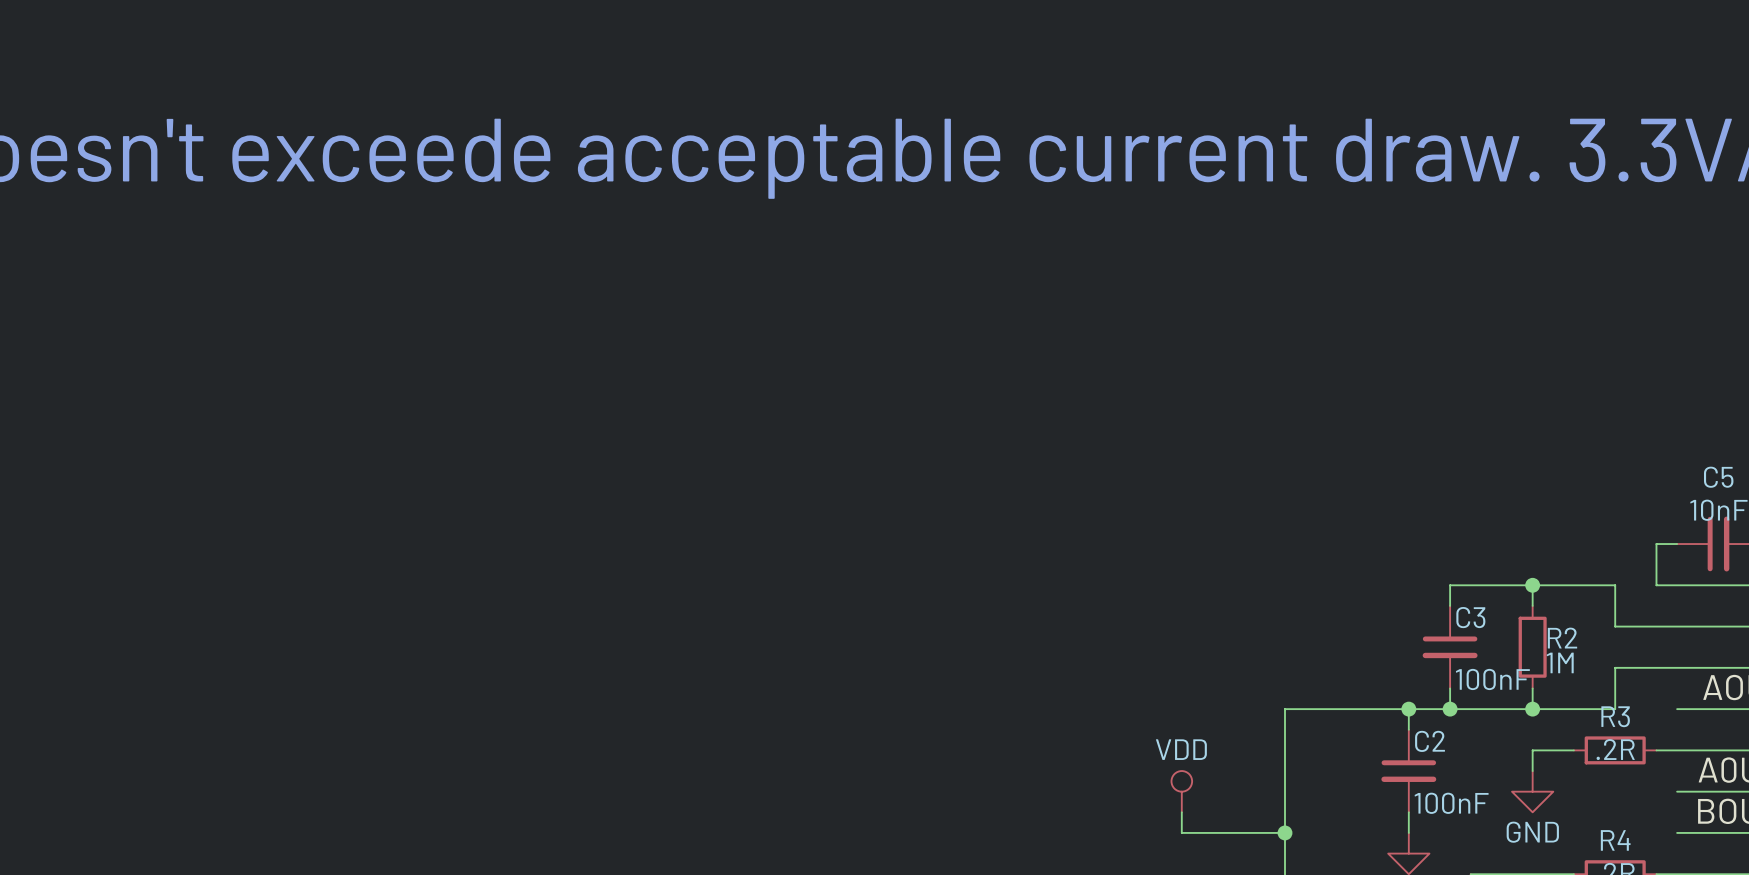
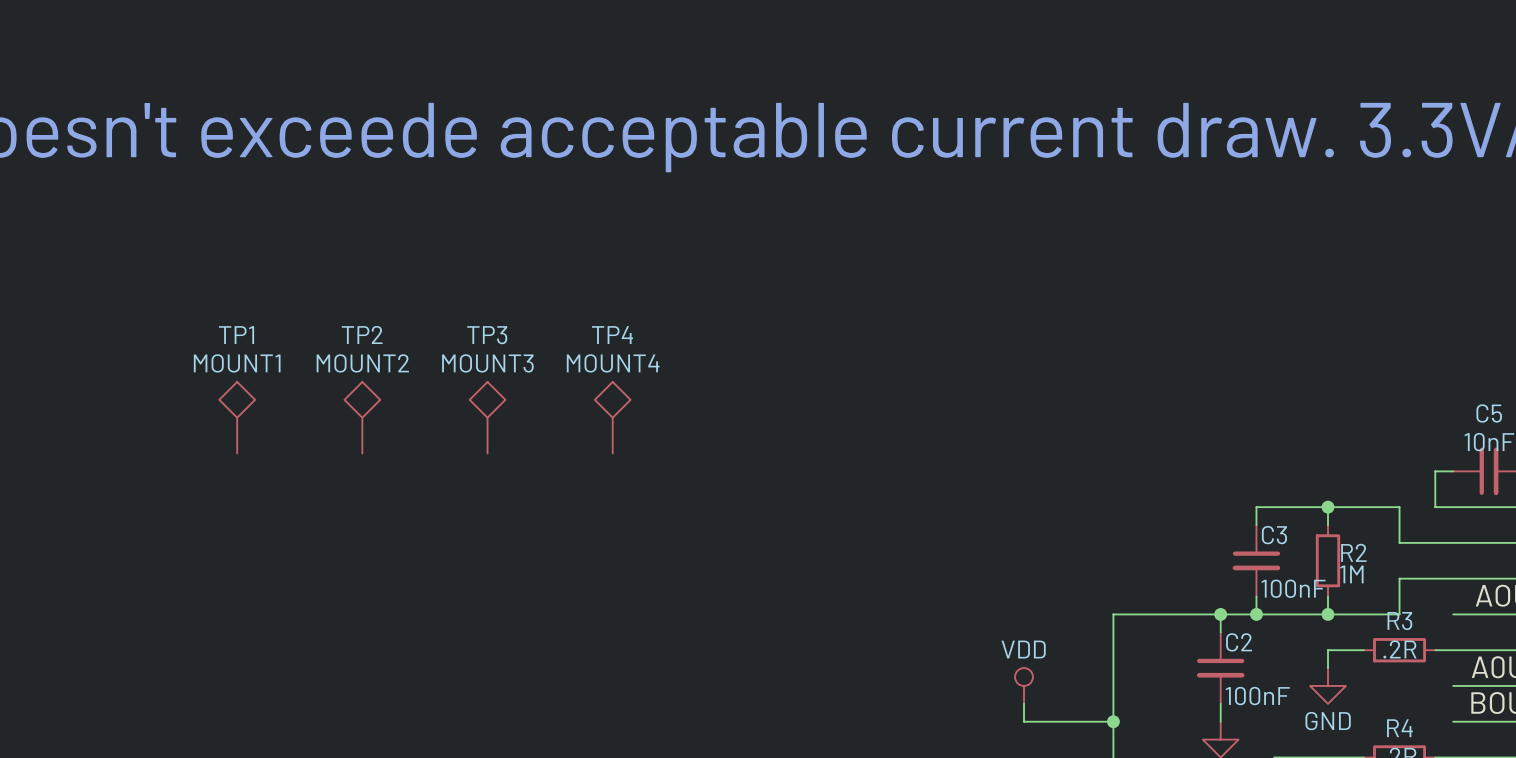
TP1: none -> MOUNT1 (237, 417)
TP2: none -> MOUNT2 (362, 417)
TP3: none -> MOUNT3 (487, 417)
TP4: none -> MOUNT4 (612, 417)

